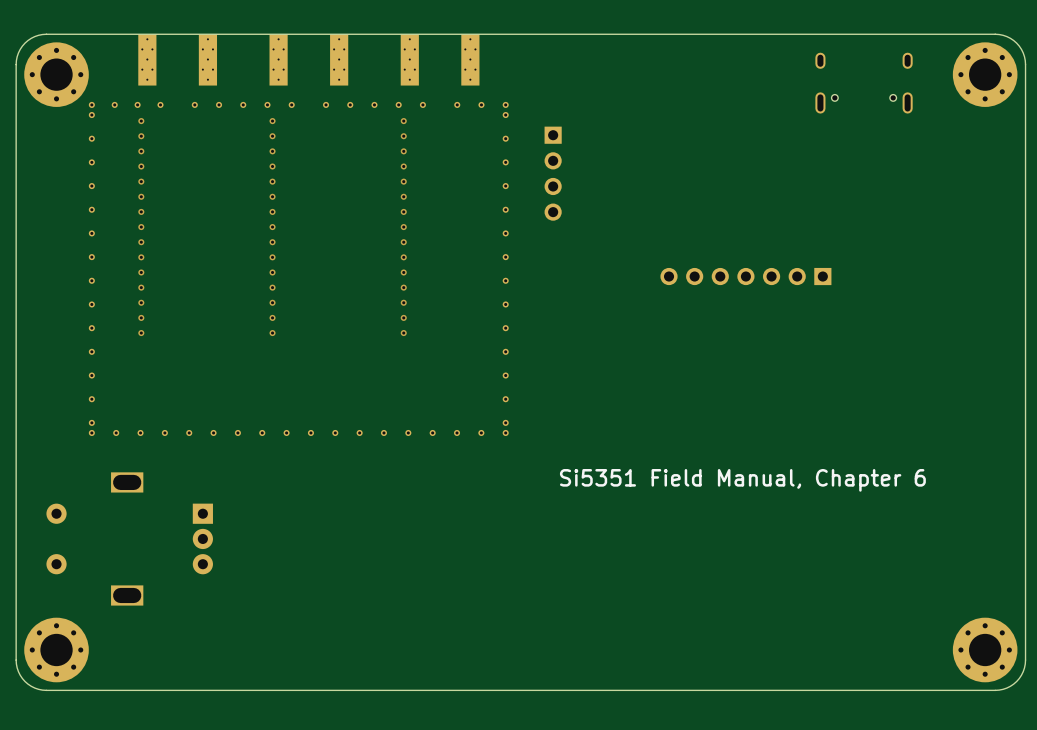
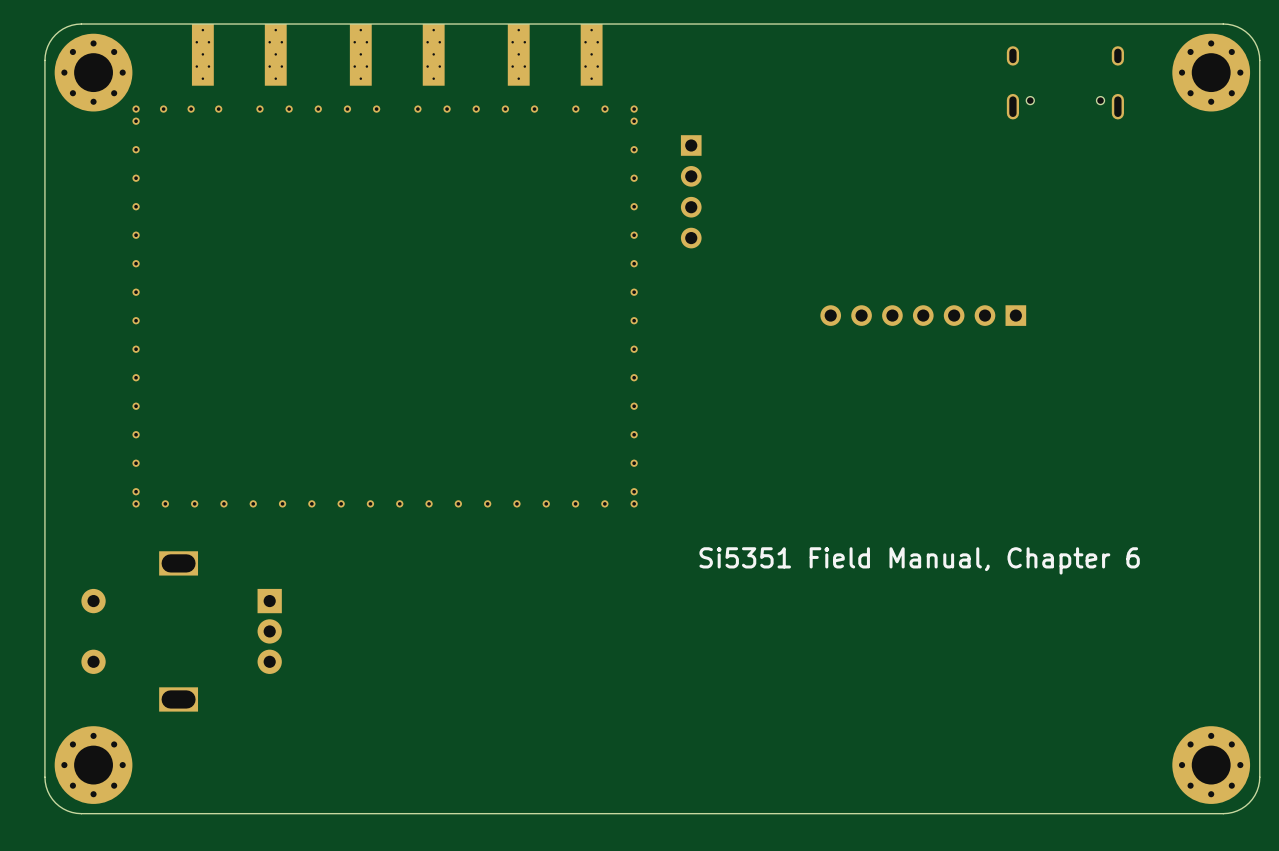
via: (141, 121) -> none
via: (272, 121) -> none
via: (403, 121) -> none
via: (141, 136) -> none
via: (272, 136) -> none
via: (403, 136) -> none
via: (141, 151) -> none
via: (272, 151) -> none
via: (403, 151) -> none
via: (141, 166) -> none
via: (272, 166) -> none
via: (403, 166) -> none
via: (141, 181) -> none
via: (272, 181) -> none
via: (403, 181) -> none
via: (141, 196) -> none
via: (272, 196) -> none
via: (403, 196) -> none
via: (141, 211) -> none
via: (272, 211) -> none
via: (403, 211) -> none
via: (141, 227) -> none
via: (272, 227) -> none
via: (403, 227) -> none
via: (141, 242) -> none
via: (272, 242) -> none
via: (403, 242) -> none
via: (141, 257) -> none
via: (272, 257) -> none
via: (403, 257) -> none
via: (141, 272) -> none
via: (272, 272) -> none
via: (403, 272) -> none
via: (141, 287) -> none
via: (272, 287) -> none
via: (403, 287) -> none
via: (141, 302) -> none
via: (272, 302) -> none
via: (403, 302) -> none
via: (141, 317) -> none
via: (272, 317) -> none
via: (403, 317) -> none
via: (141, 333) -> none
via: (272, 333) -> none
via: (403, 333) -> none

